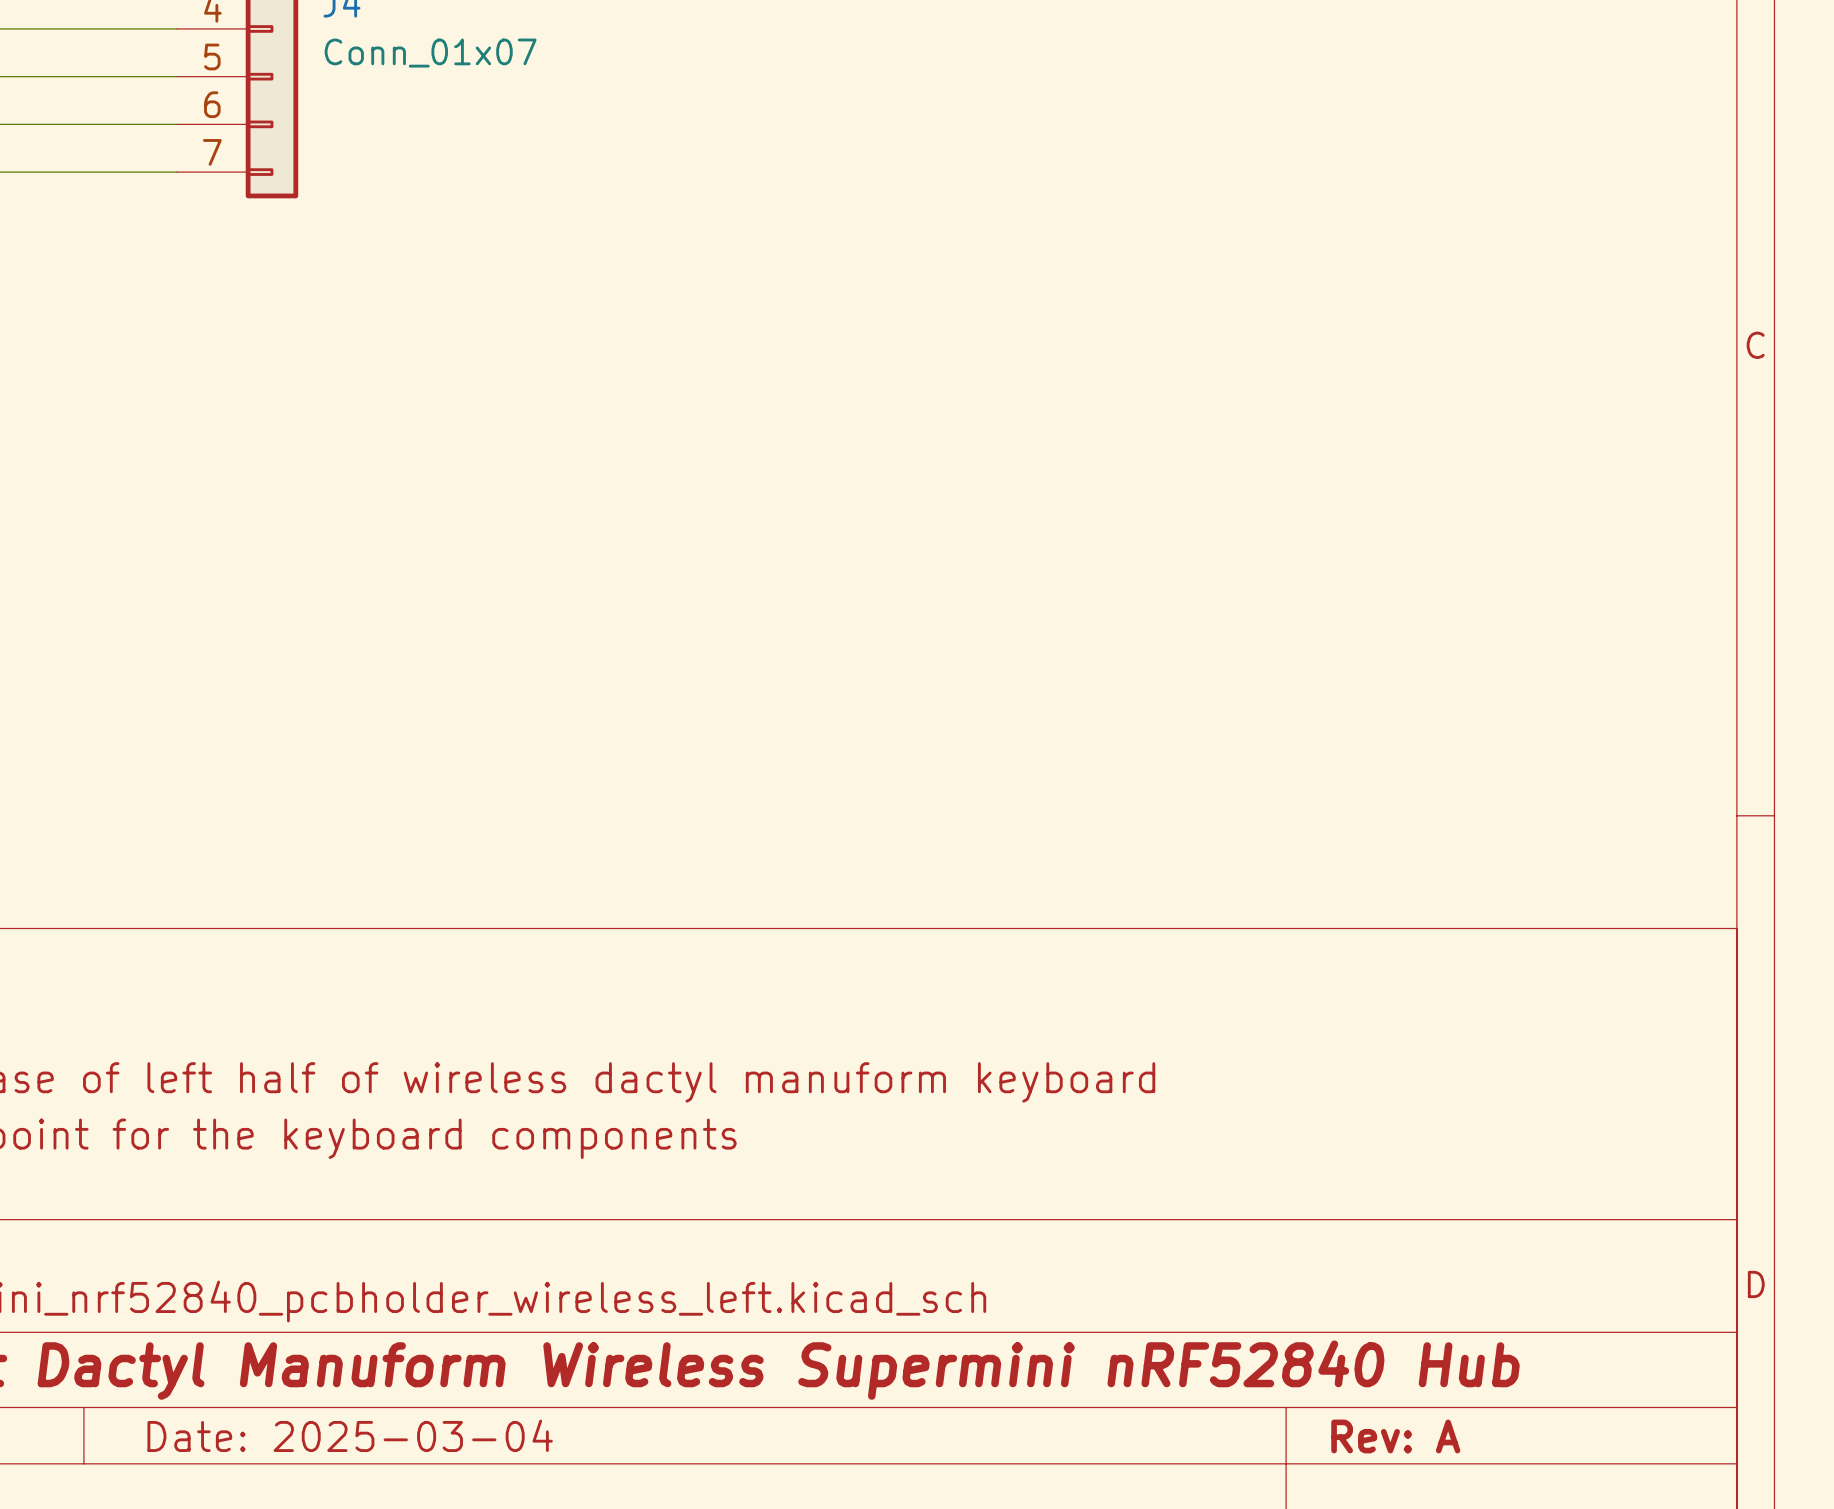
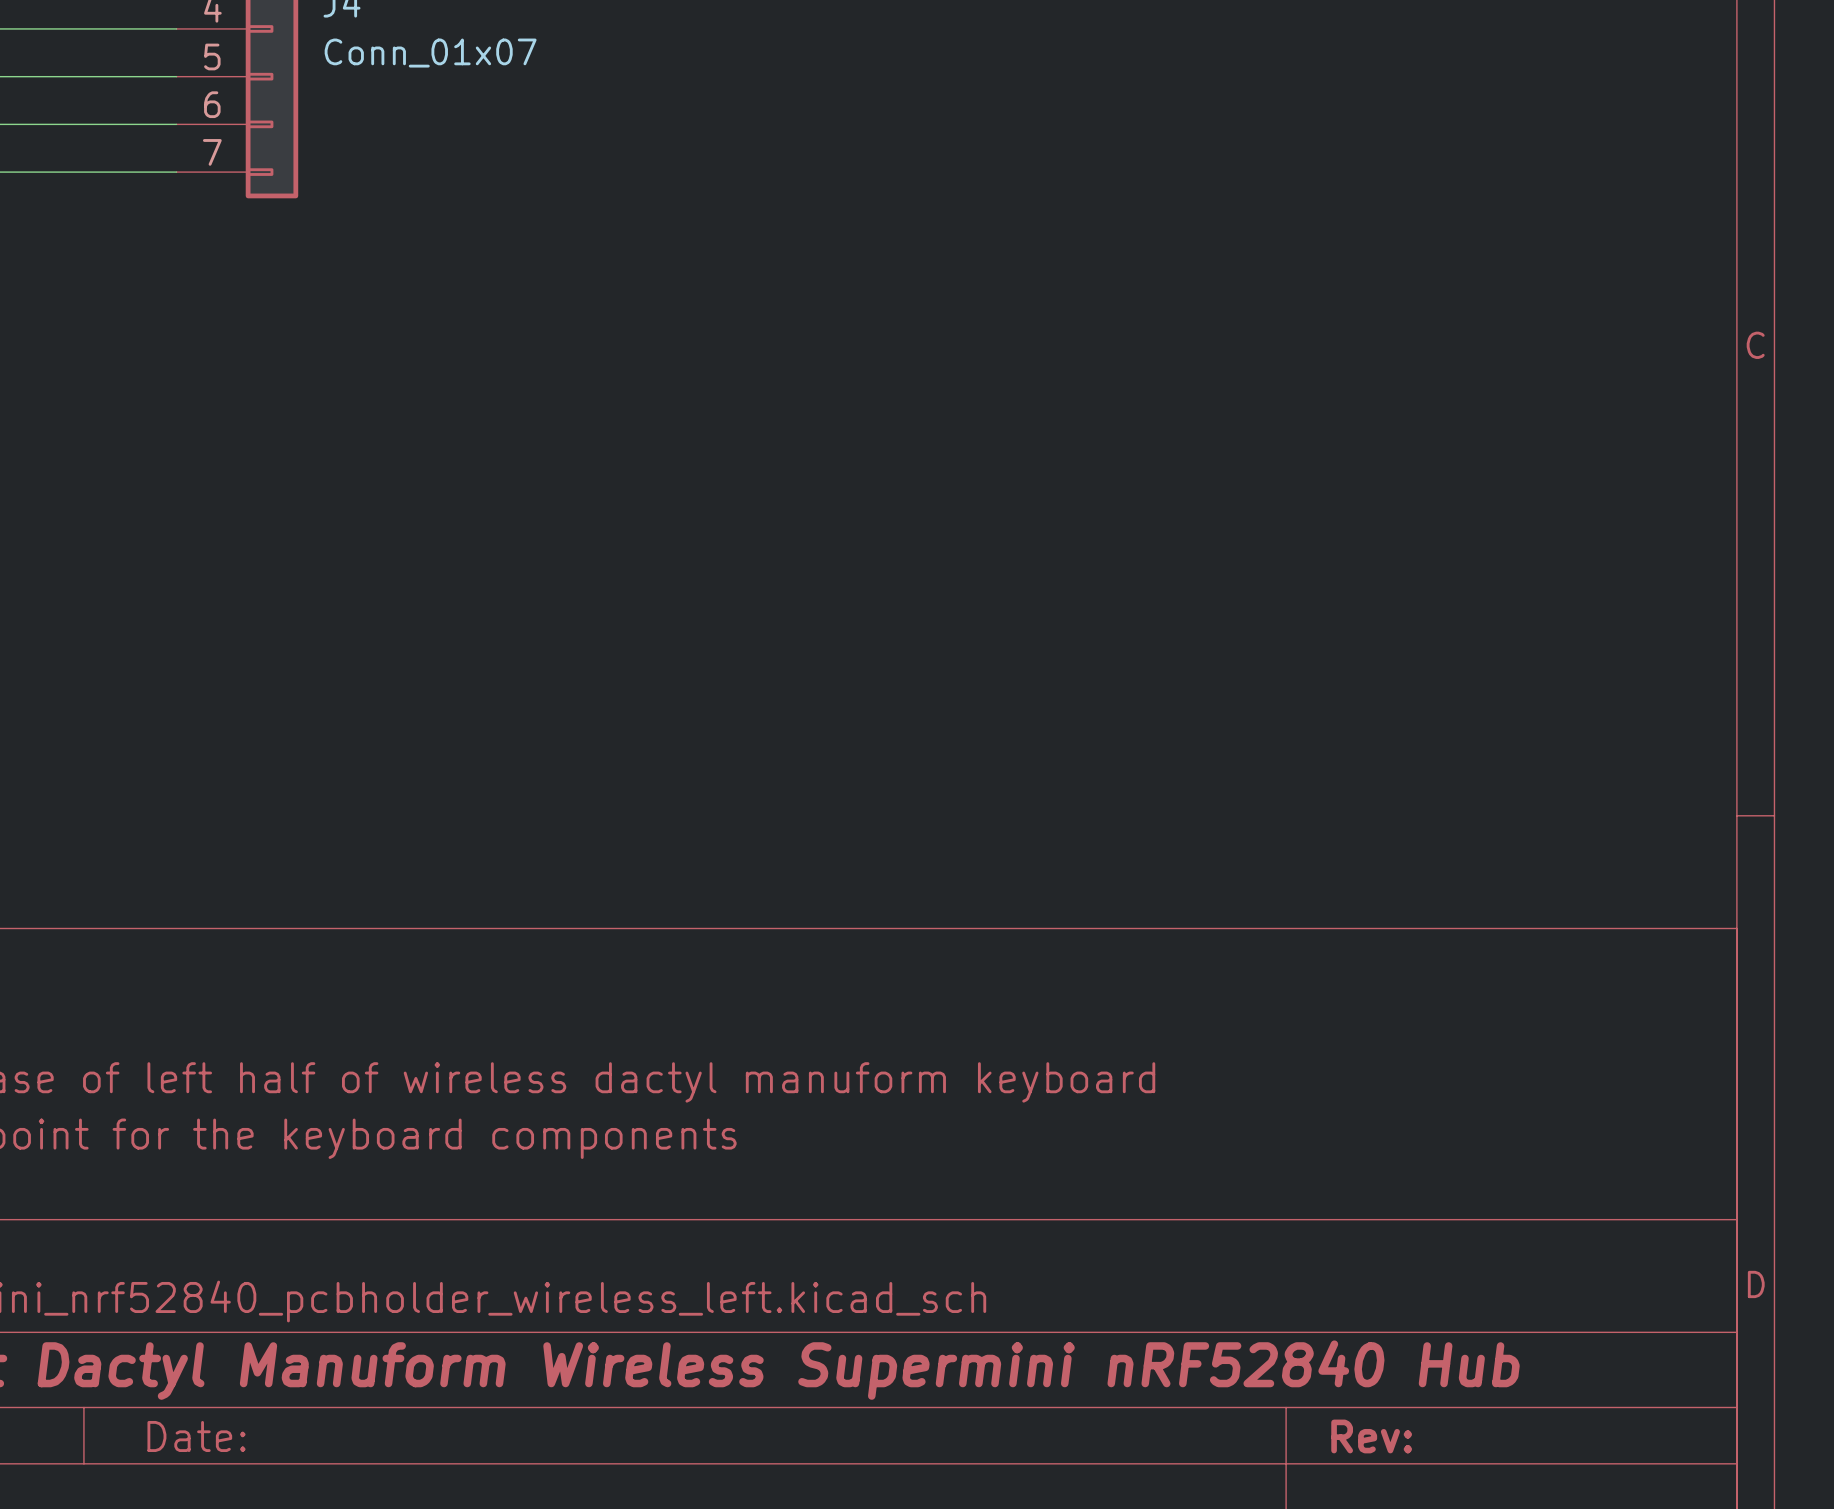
title block: Date: 2025-03-04 (350, 1435) -> Date: (196, 1436)
title block: Rev: A (1395, 1436) -> Rev: (1371, 1436)

